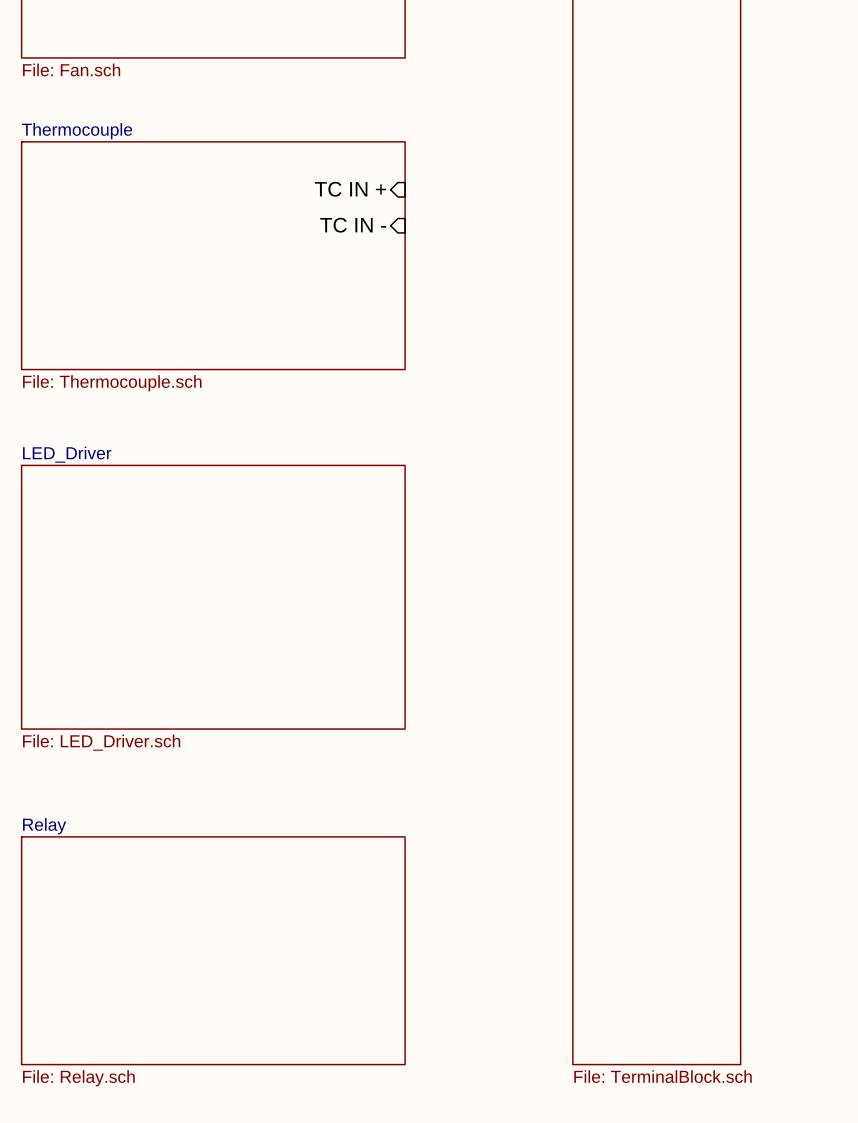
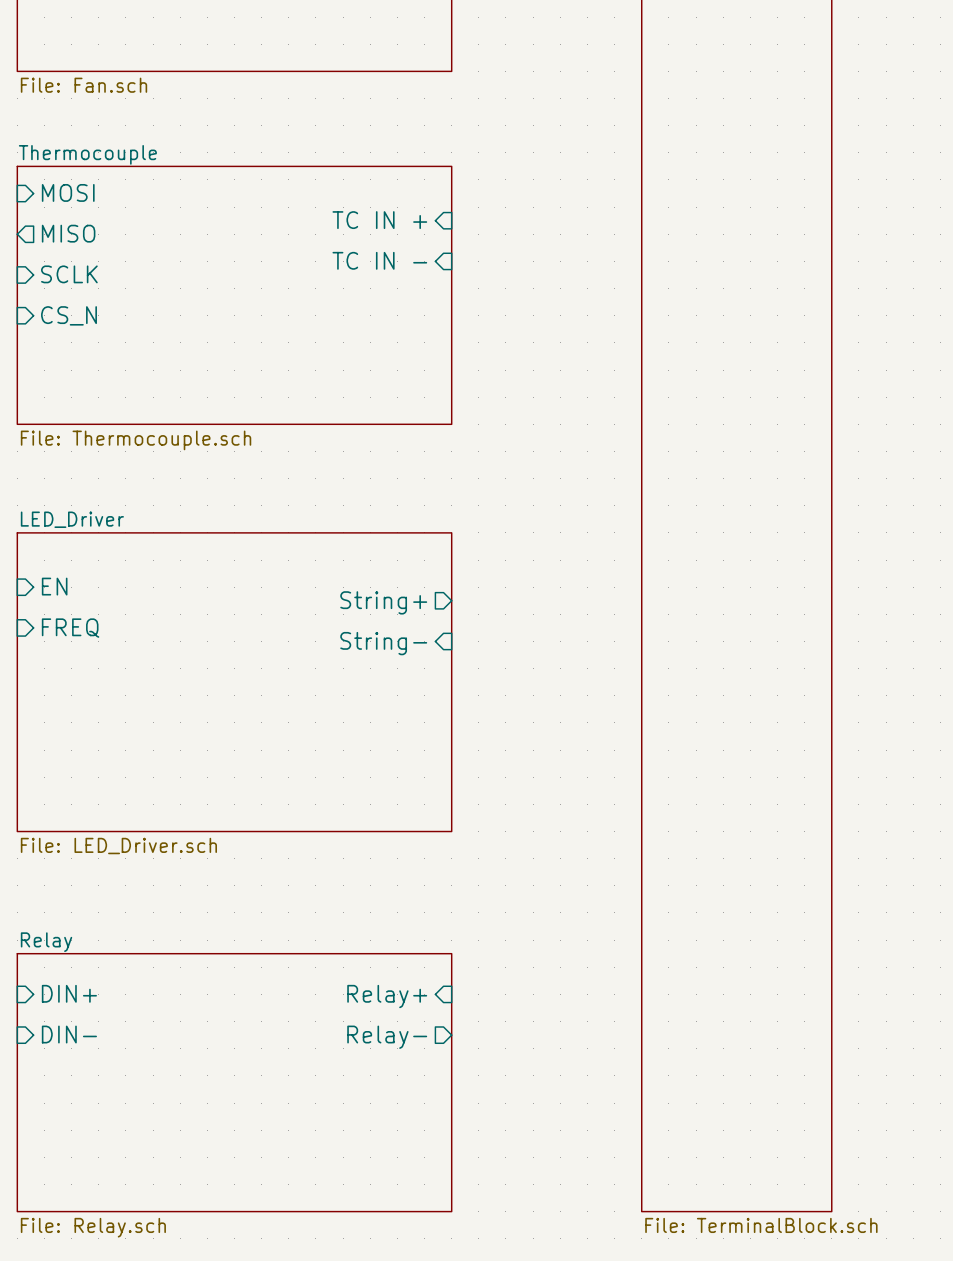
sheet pin: none -> MOSI (68, 192)
sheet pin: none -> MISO (68, 233)
sheet pin: none -> SCLK (69, 274)
sheet pin: none -> CS_N (69, 315)
sheet pin: none -> EN (54, 586)
sheet pin: none -> String+ (383, 602)
sheet pin: none -> FREQ (70, 628)
sheet pin: none -> String- (383, 643)
sheet pin: none -> DIN+ (69, 993)
sheet pin: none -> Relay+ (387, 996)
sheet pin: none -> DIN- (69, 1034)
sheet pin: none -> Relay- (387, 1037)

